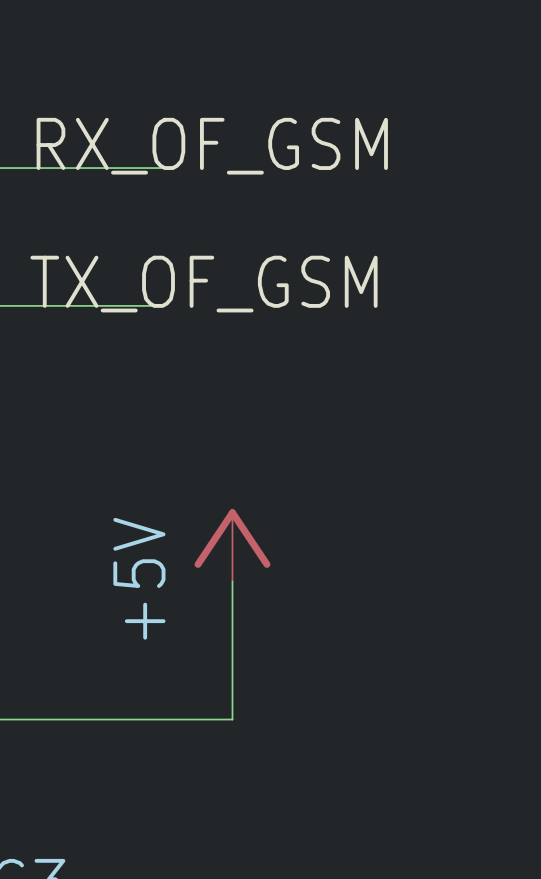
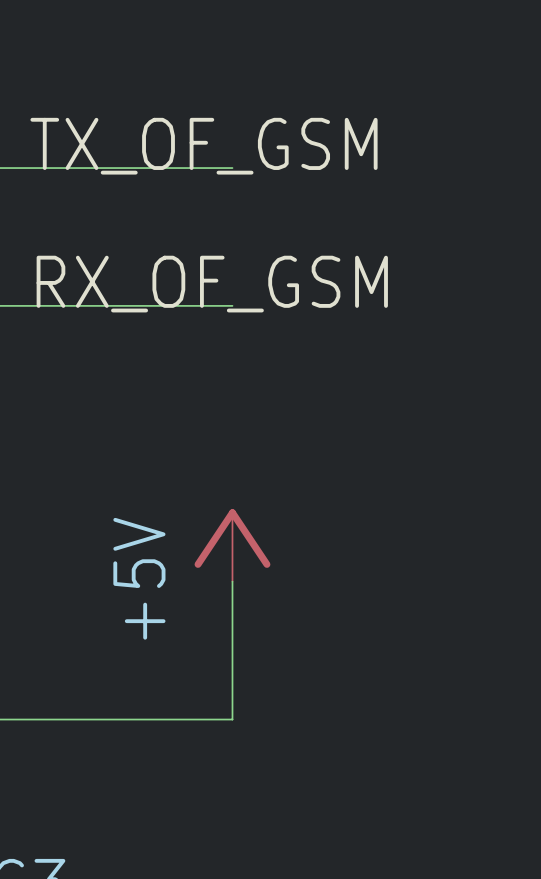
label: RX_OF_GSM (212, 146) -> TX_OF_GSM (204, 146)
wire: none -> (163, 168) (232, 168)
label: TX_OF_GSM (204, 284) -> RX_OF_GSM (212, 284)
wire: none -> (163, 305) (232, 305)

